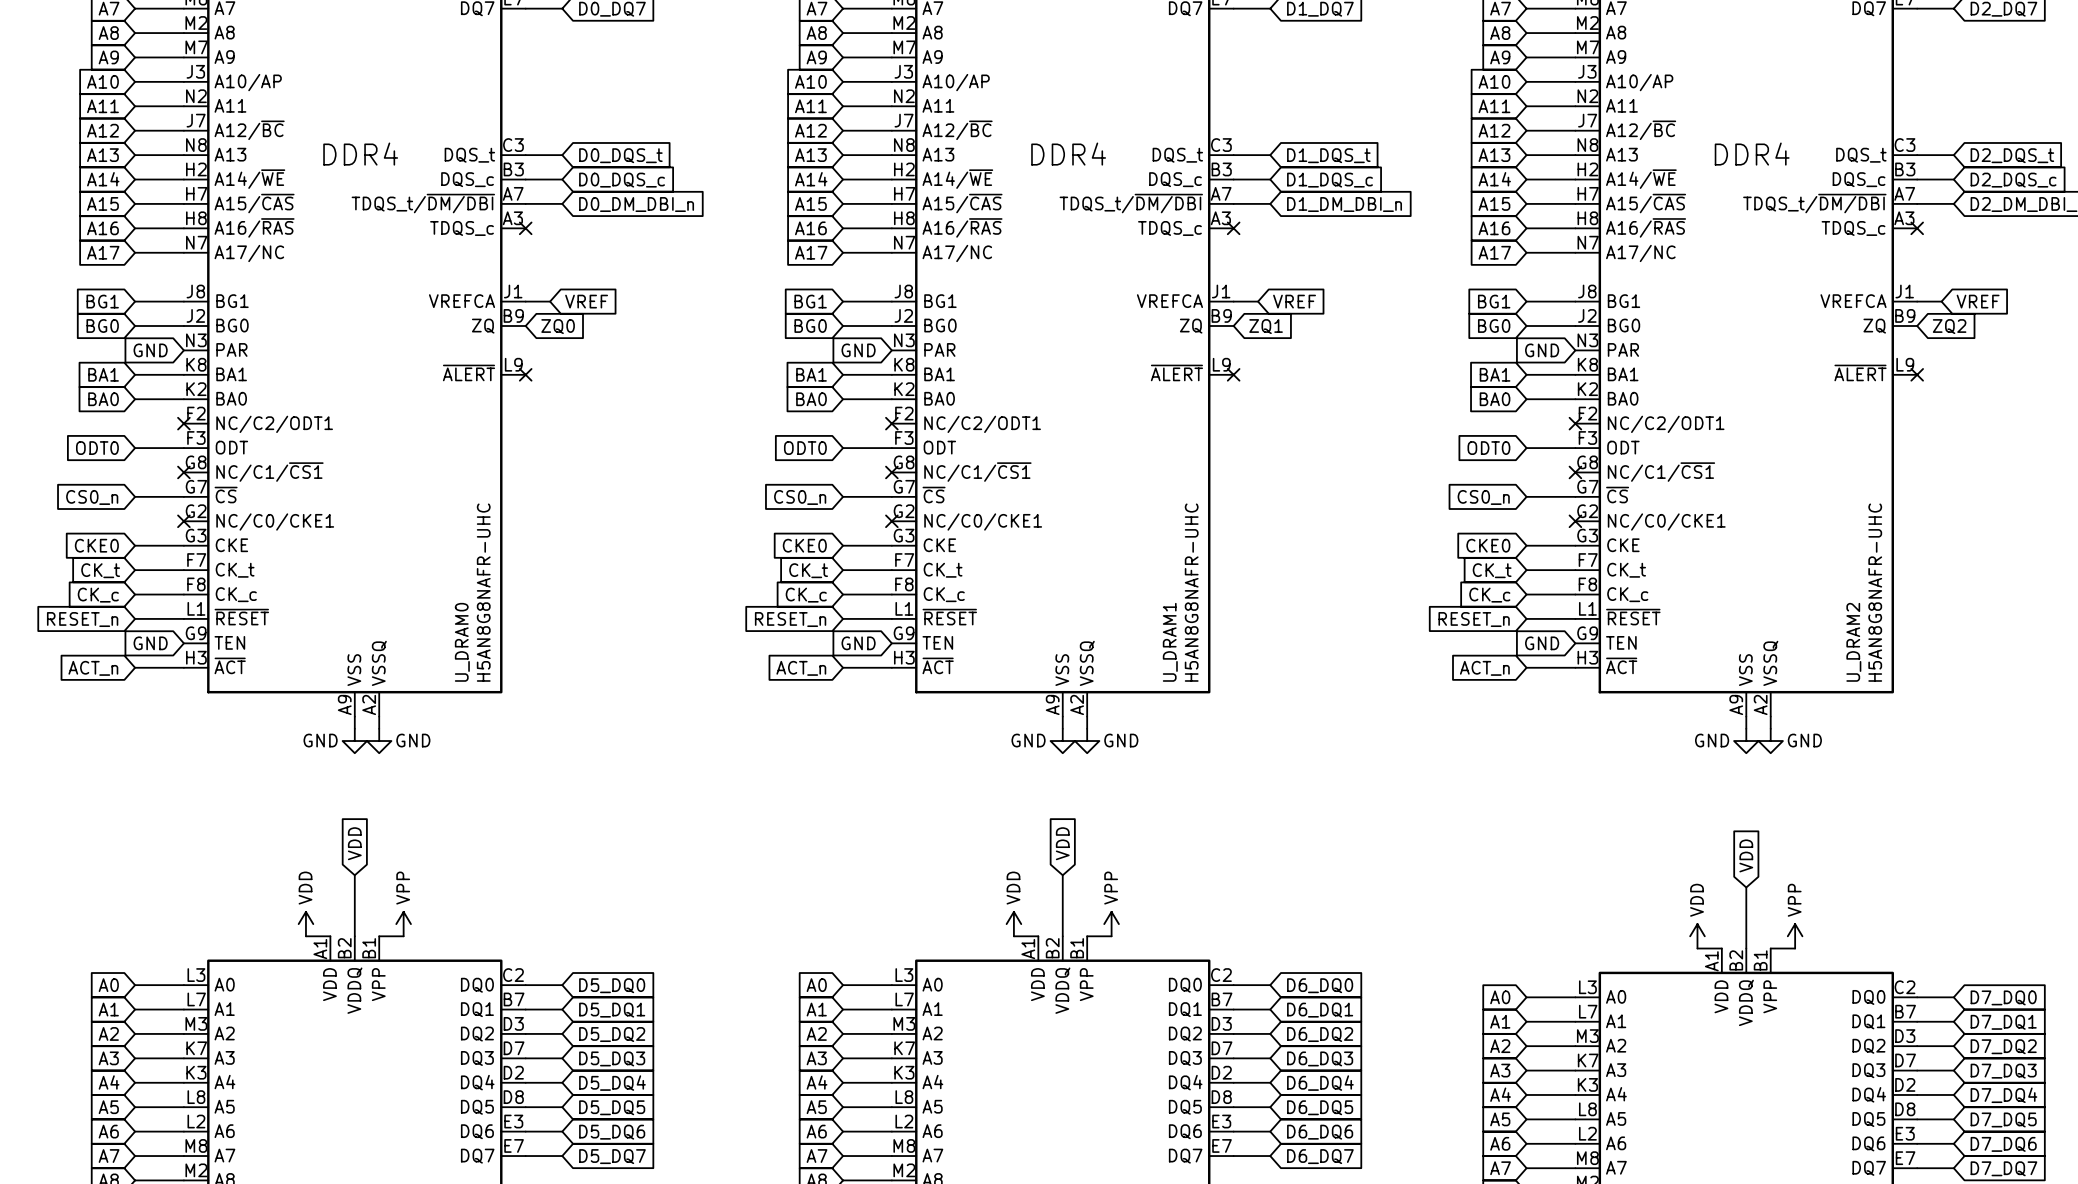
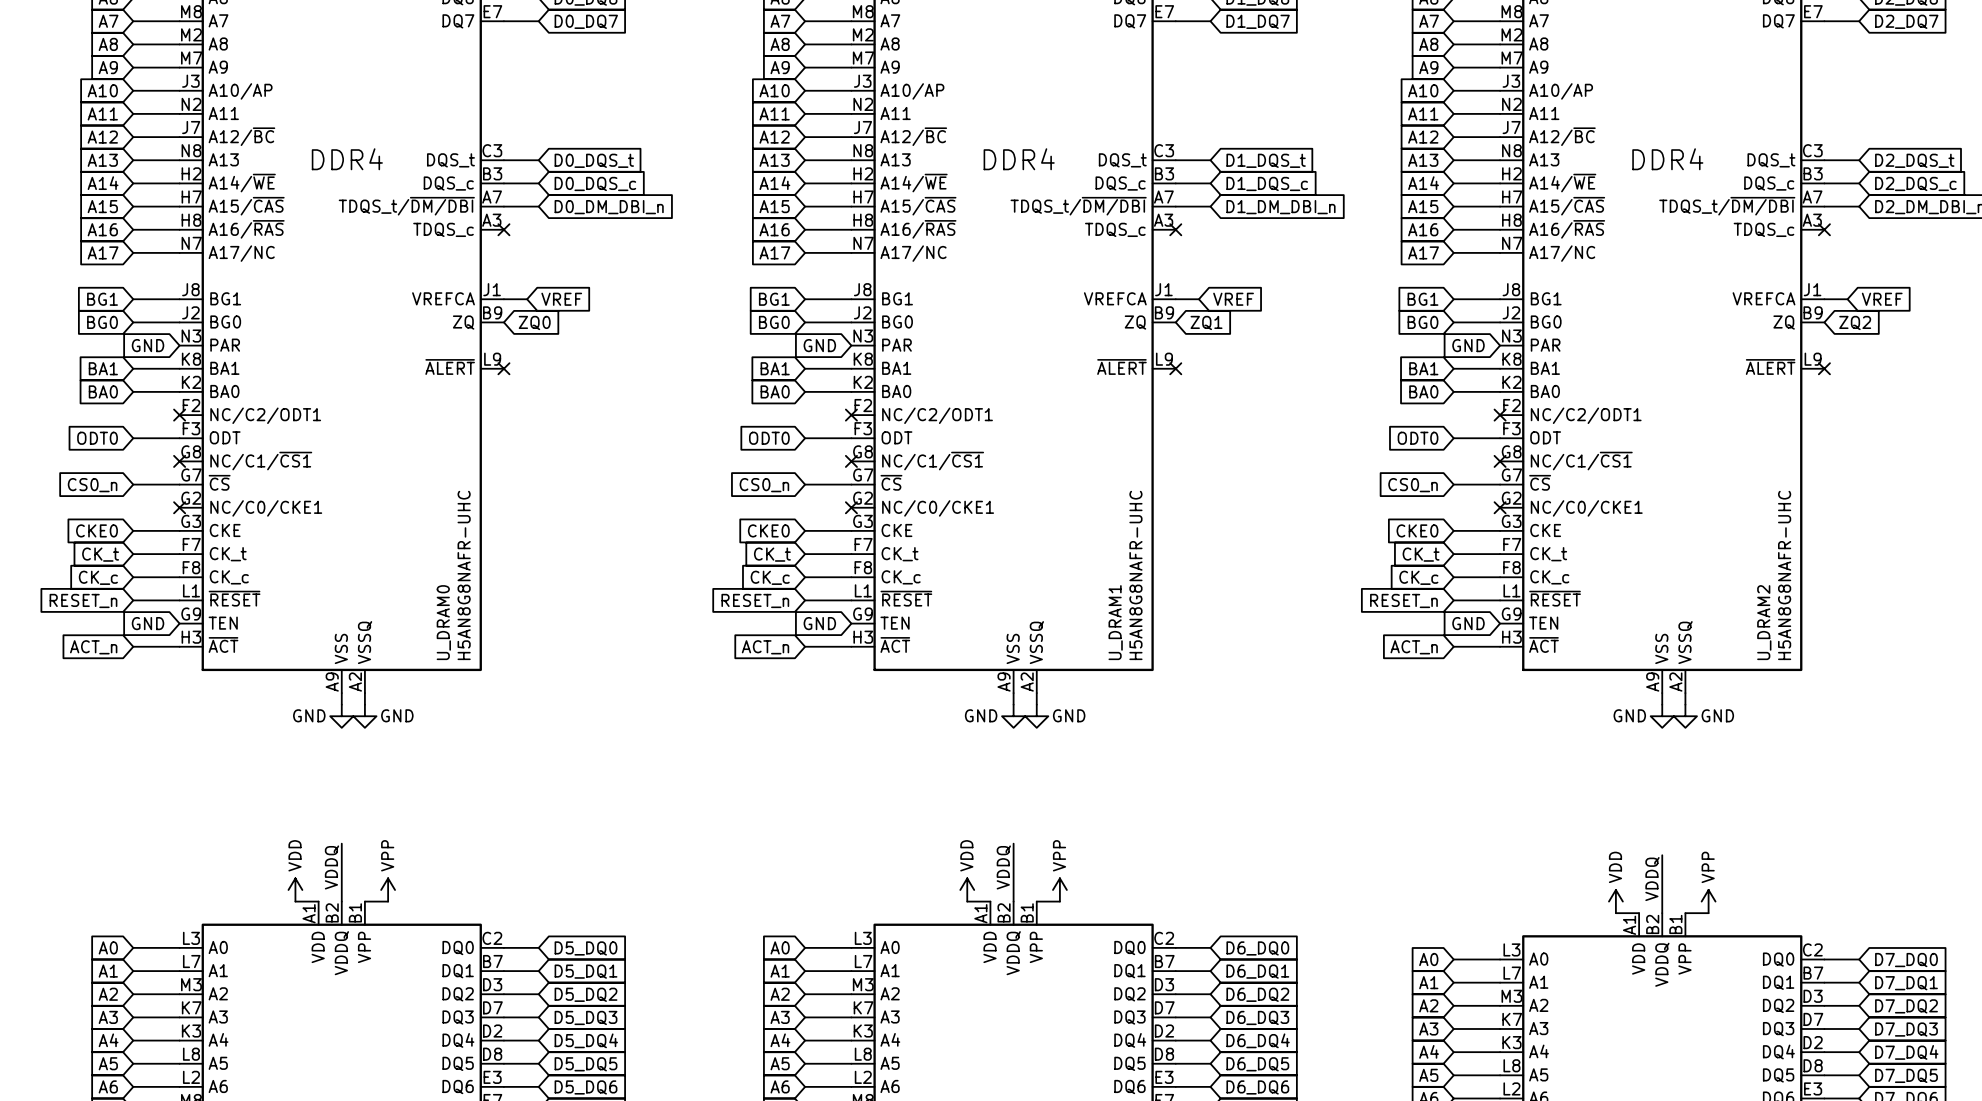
global label: VDD (354, 843) -> none
global label: VDD (1062, 843) -> none
global label: VDD (1746, 855) -> none
label: none -> VDDQ (331, 867)
label: none -> VDDQ (1003, 867)
label: none -> VDDQ (1652, 879)

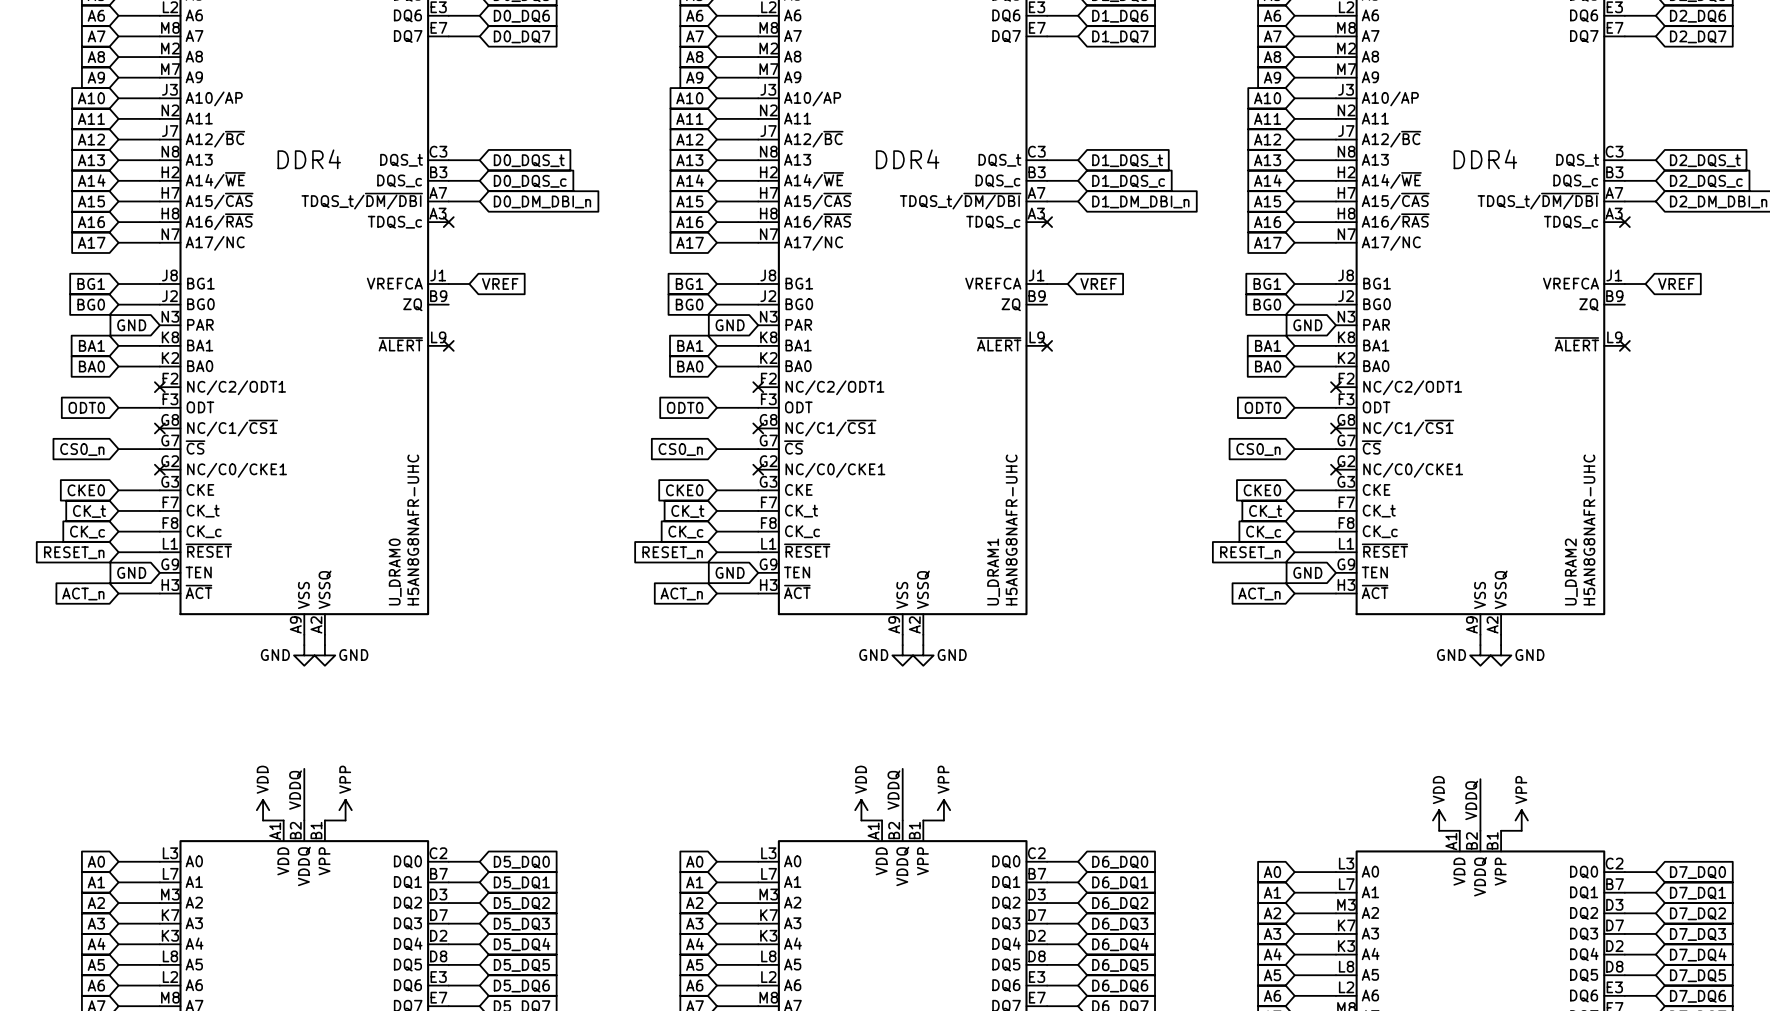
global label: ZQ0 (534, 322) -> none
global label: ZQ1 (1206, 322) -> none
global label: ZQ2 (1855, 322) -> none

